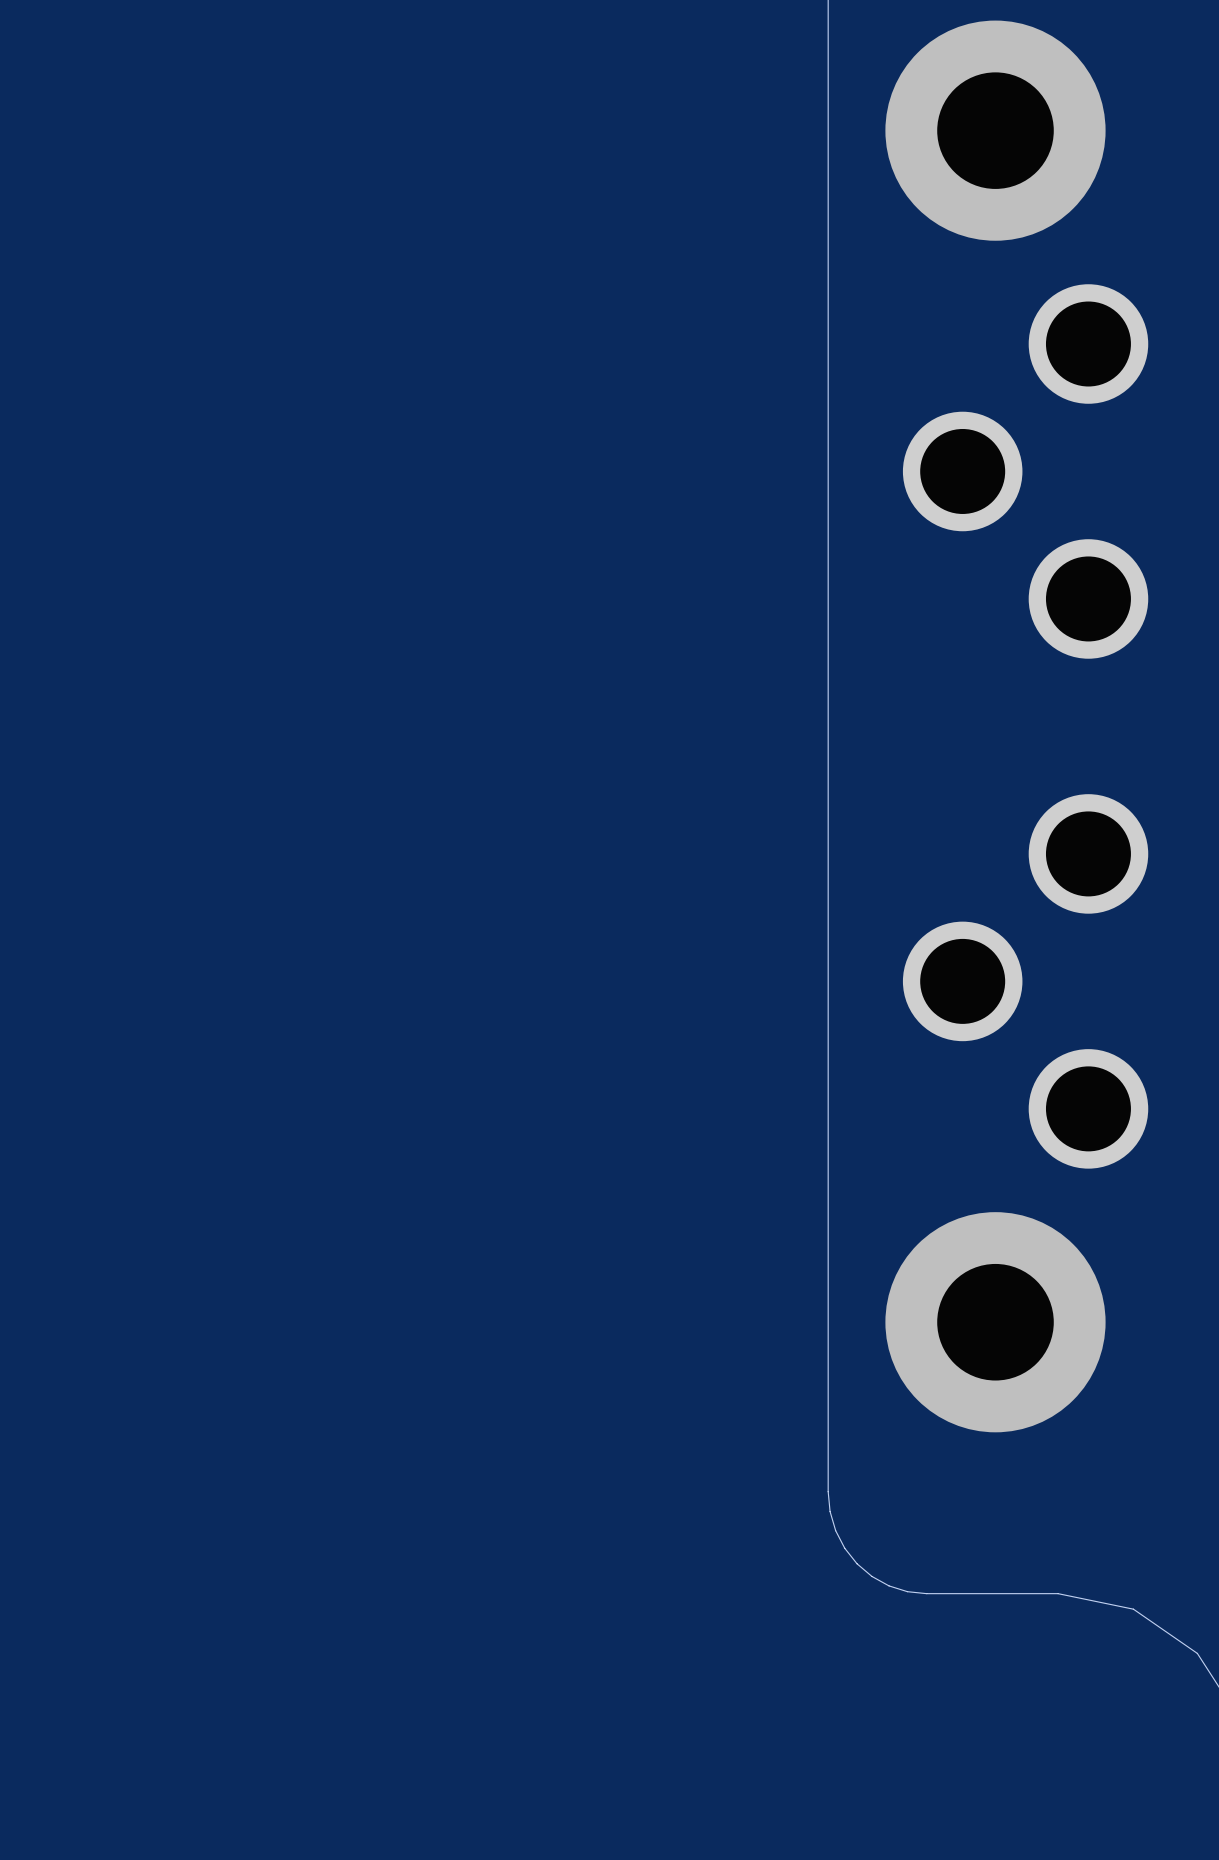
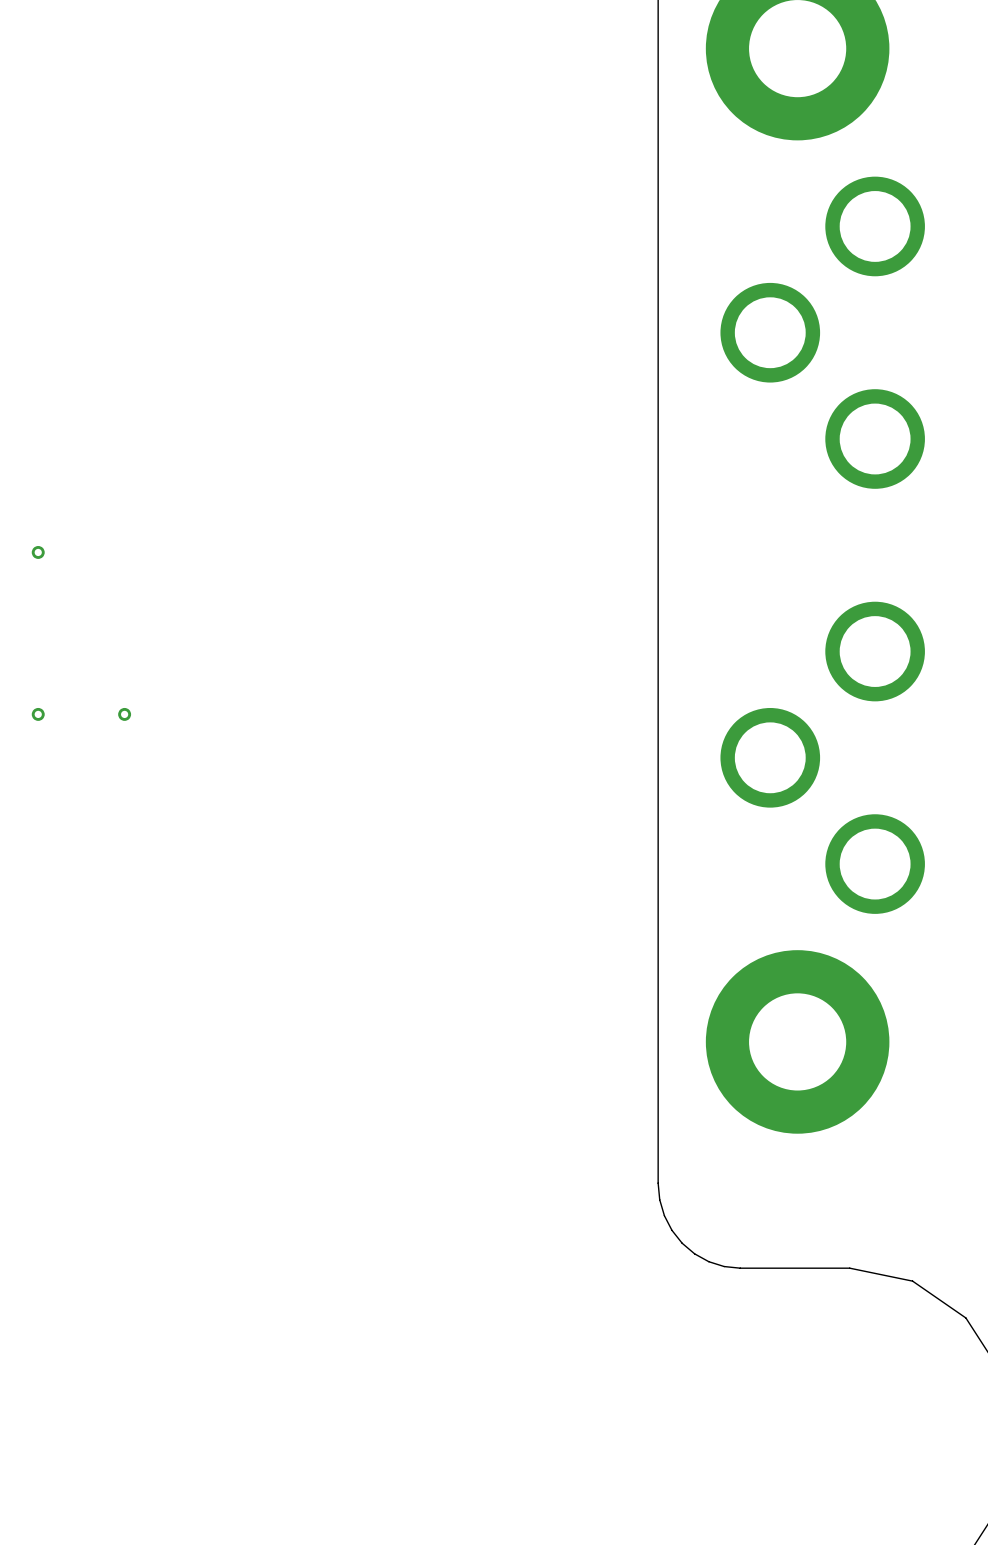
via: none -> (38, 552)
via: none -> (38, 714)
via: none -> (124, 714)

